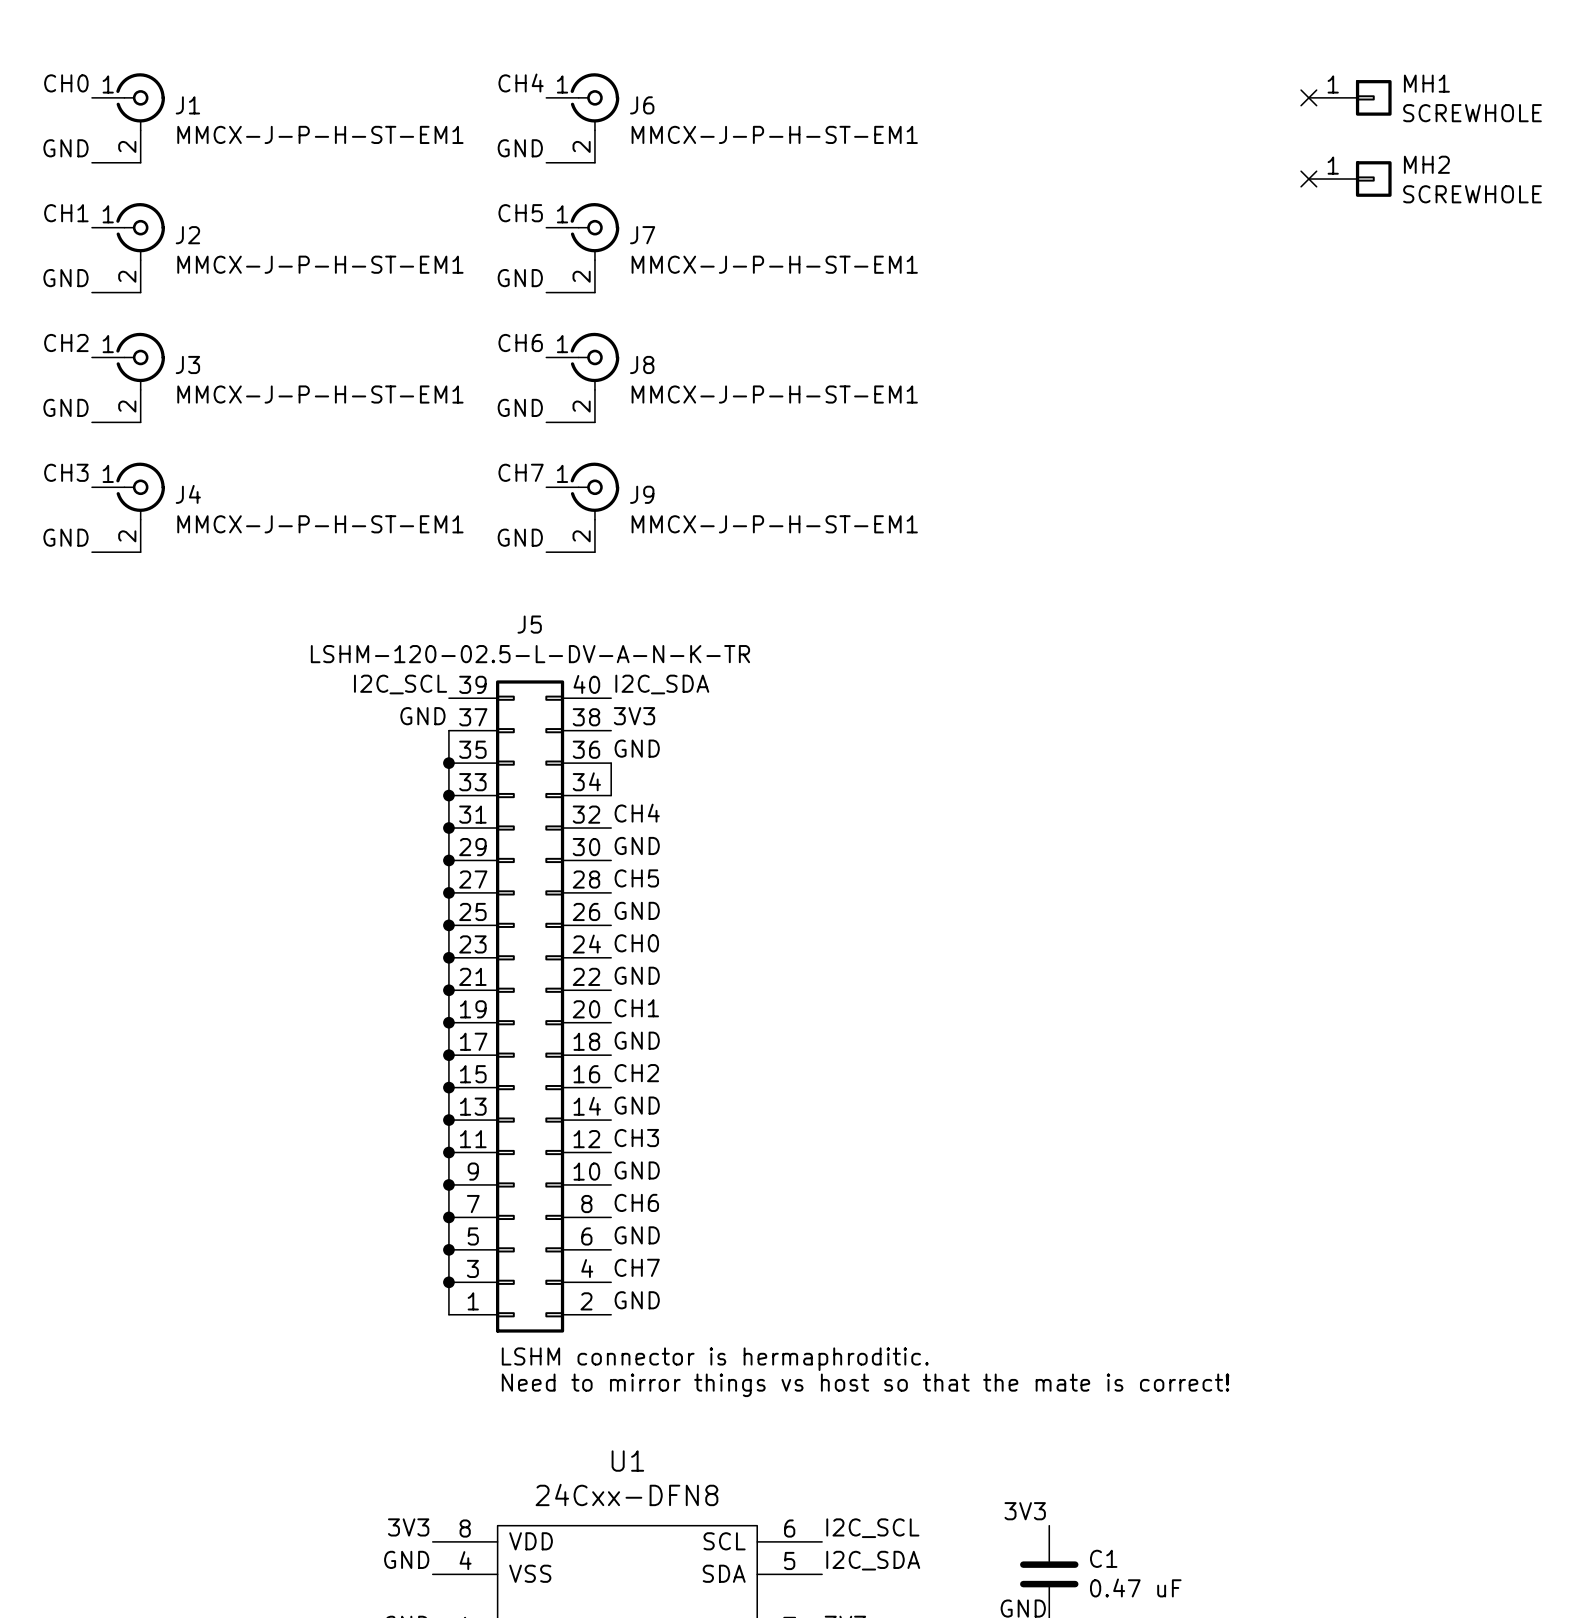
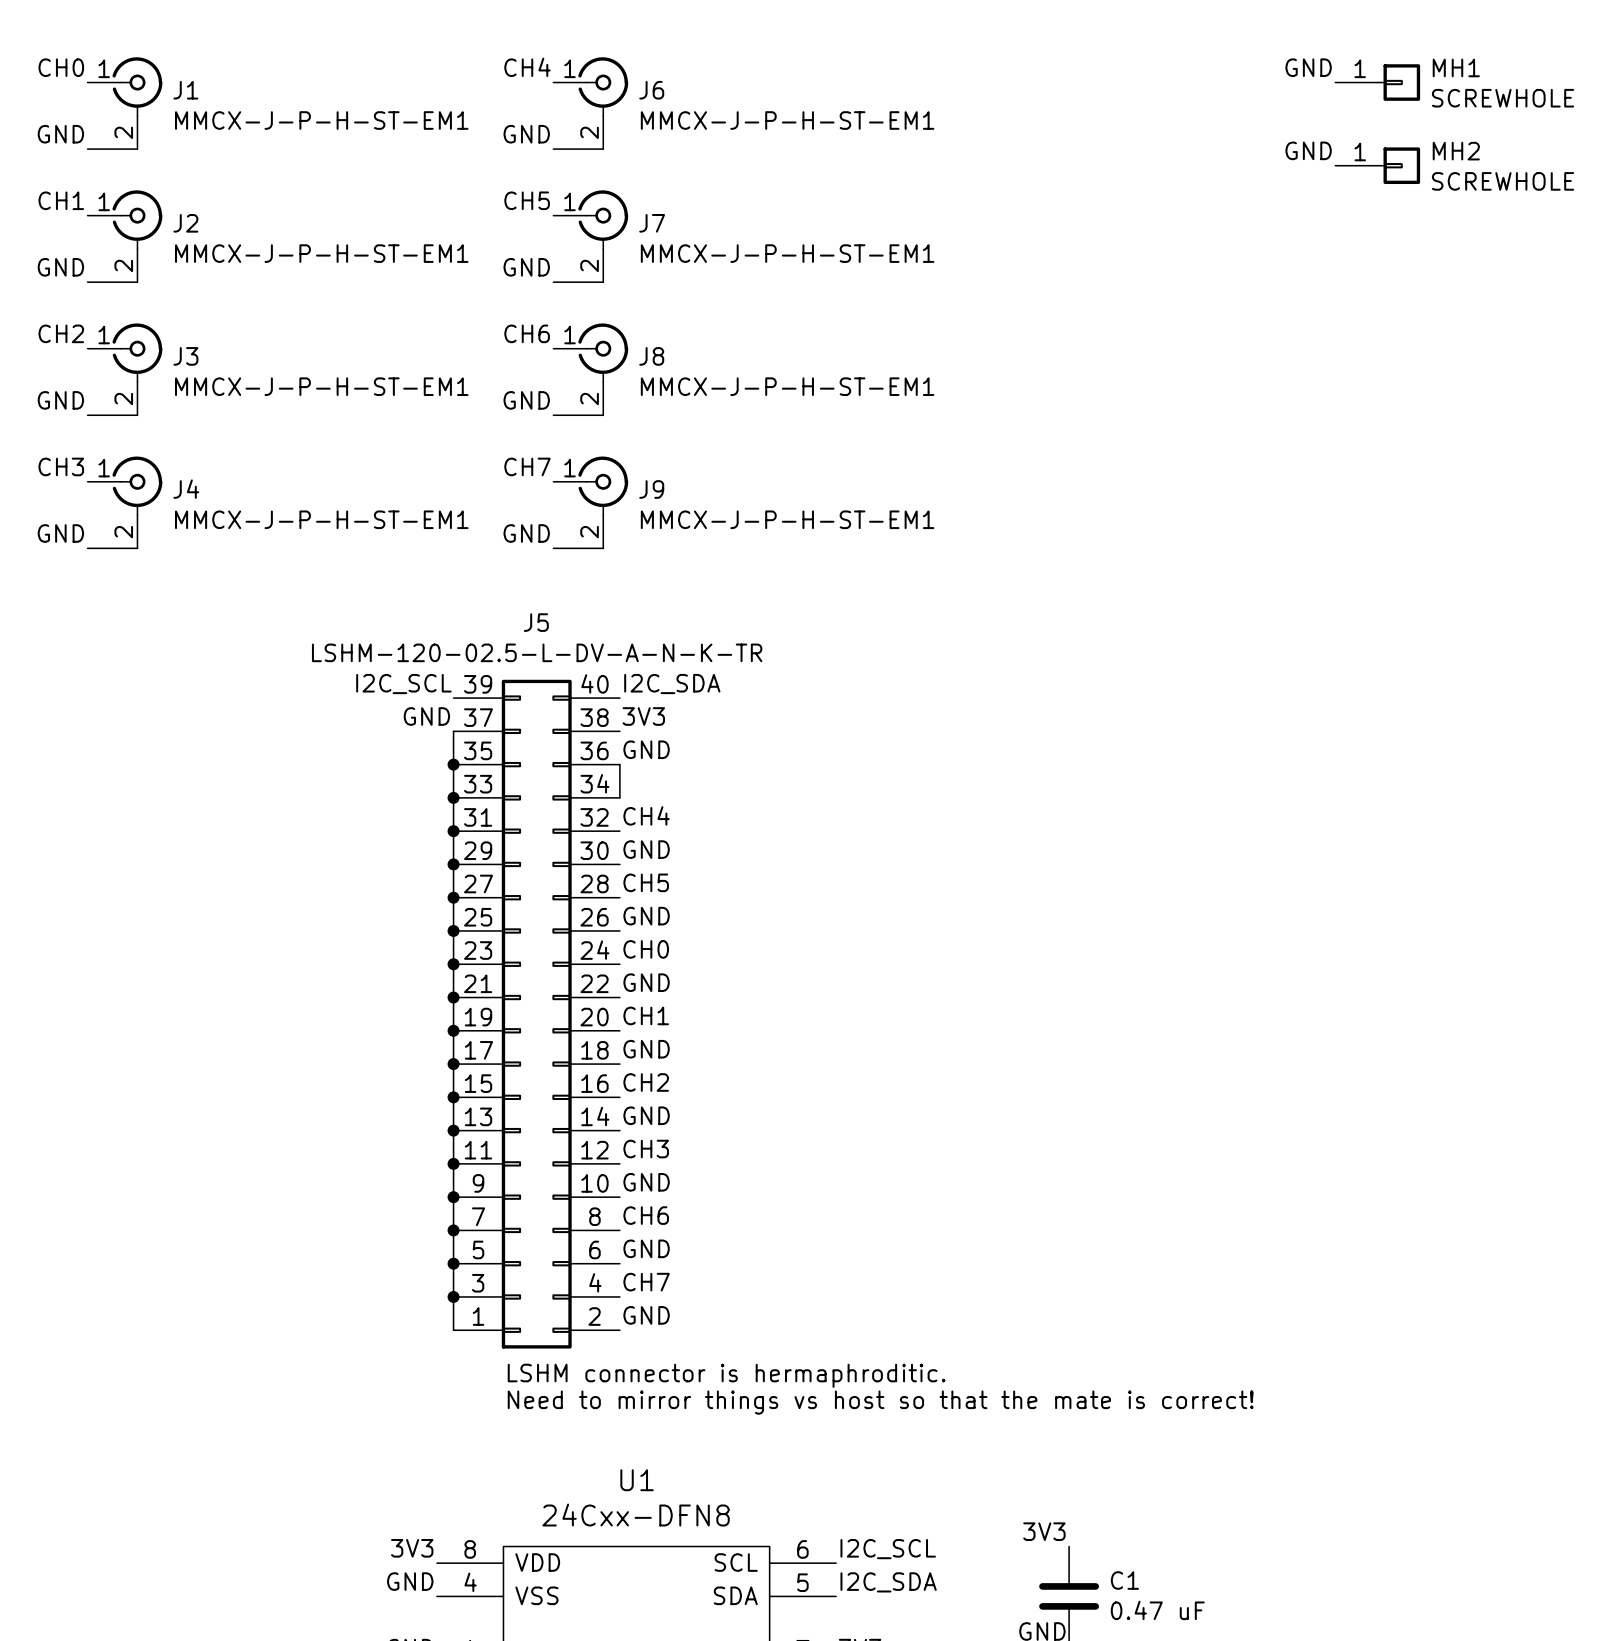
label: none -> GND (1308, 67)
no-connect mark: (1308, 97) -> none
label: none -> GND (1308, 150)
no-connect mark: (1308, 179) -> none

